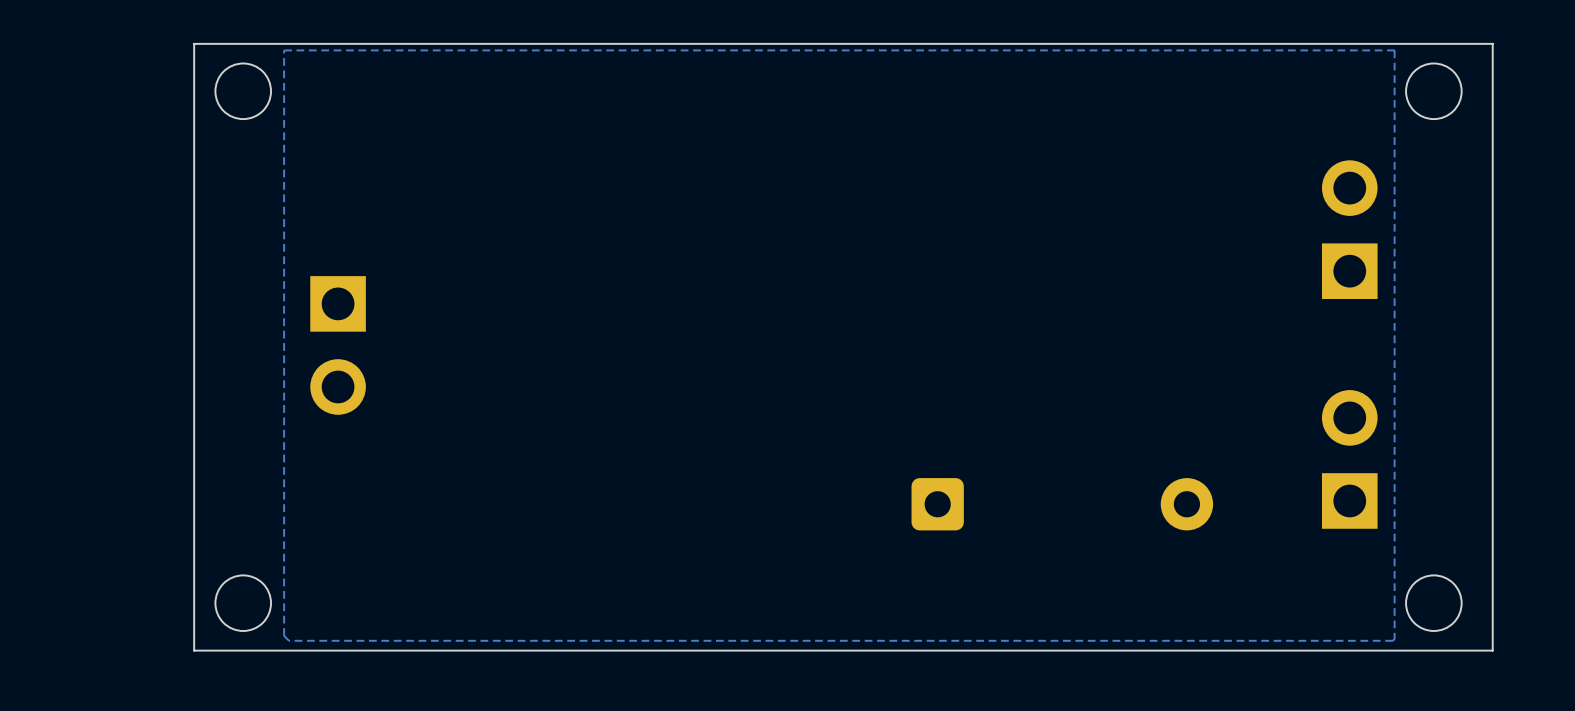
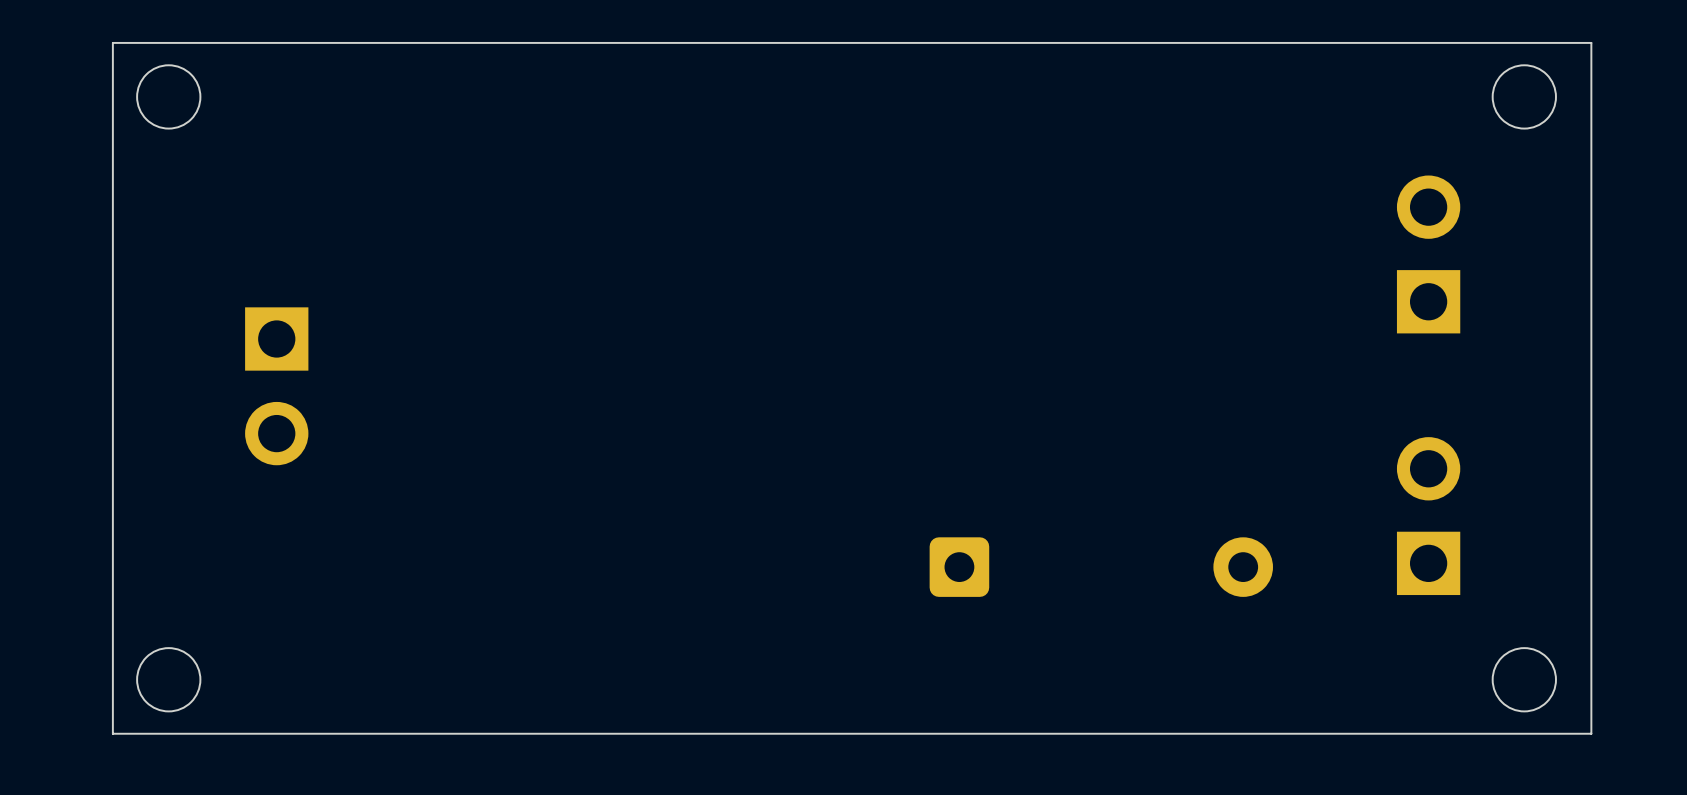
zone outline: (1394, 50) (1394, 639) (1392, 640) (289, 640) (284, 635) (284, 50) (1394, 50) -> none

